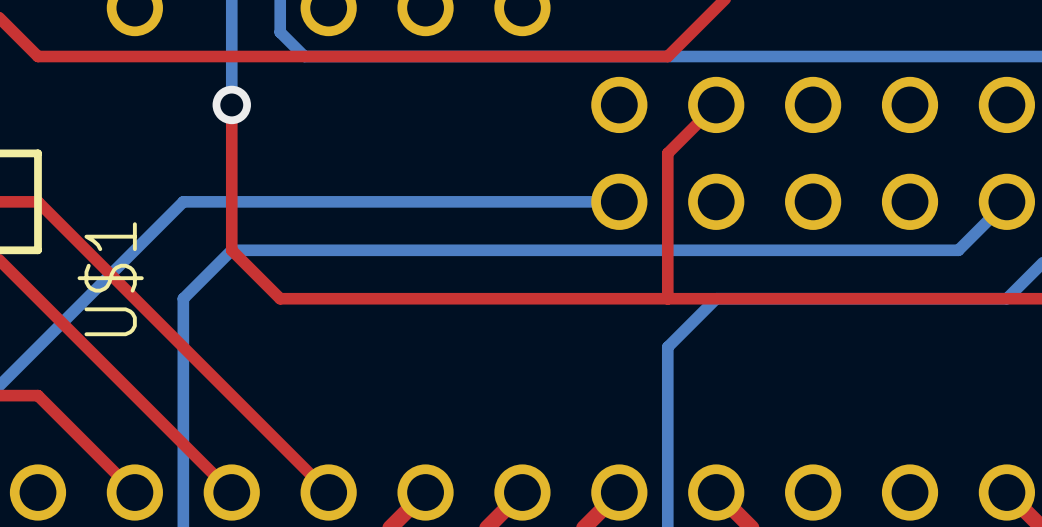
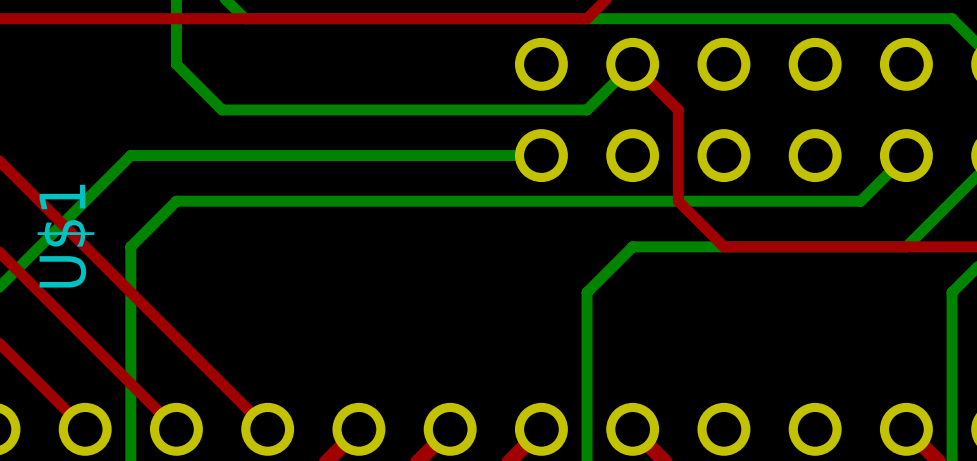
top track: (231, 104) (231, 250) (280, 298) (813, 298) -> none
bottom track: none -> (176, 64) (222, 109) (587, 109) (632, 64)
via: (231, 104) -> none
top track: (716, 104) (667, 153) (667, 298) -> (632, 64) (678, 109) (678, 201) (723, 246)

